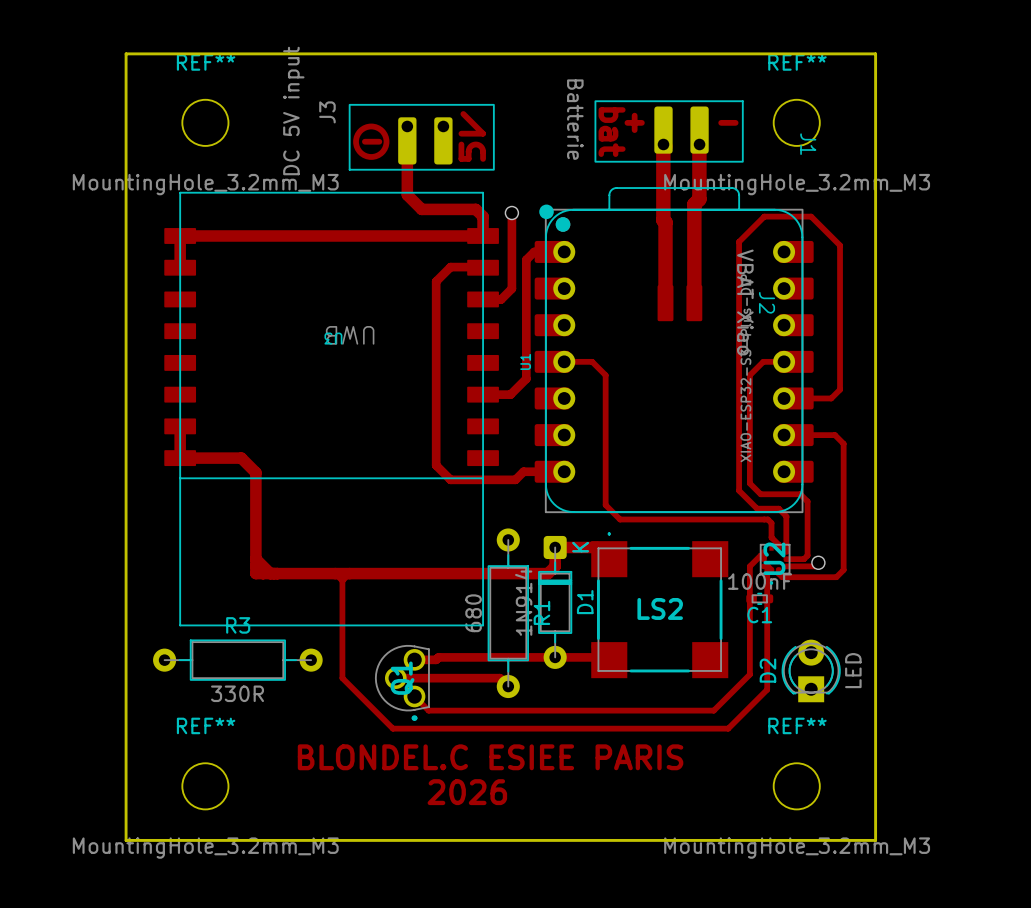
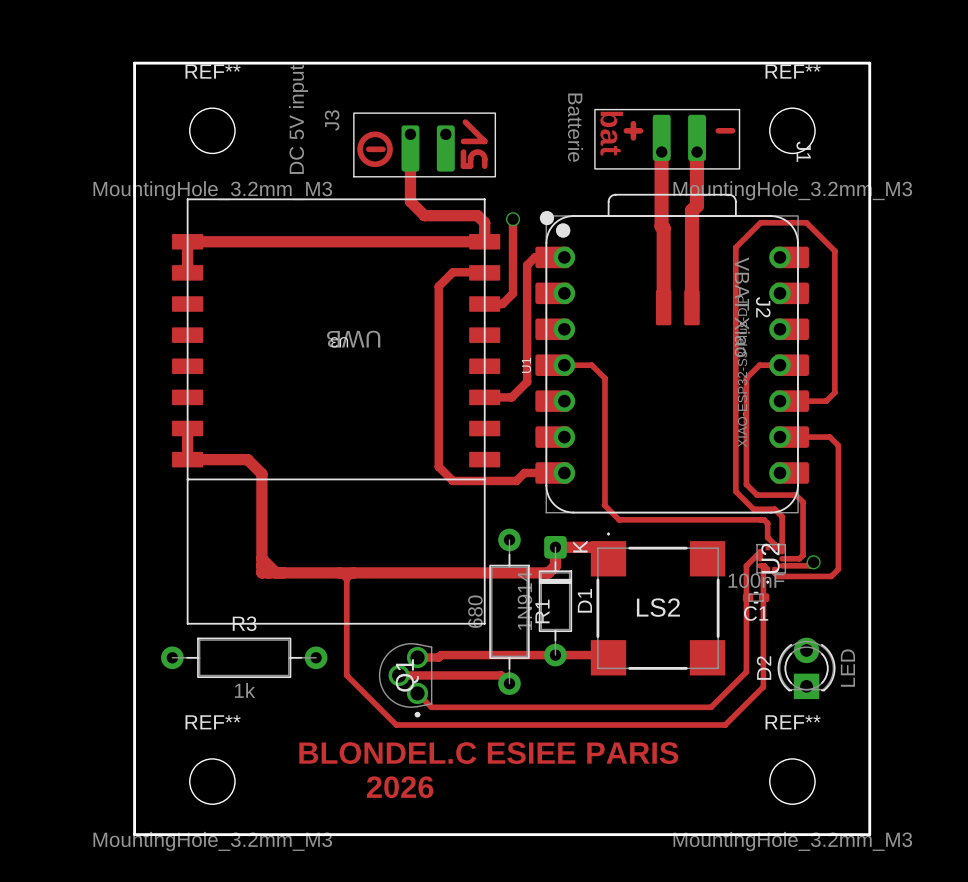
R3 value: 330R (237, 693) -> 1k (245, 690)

